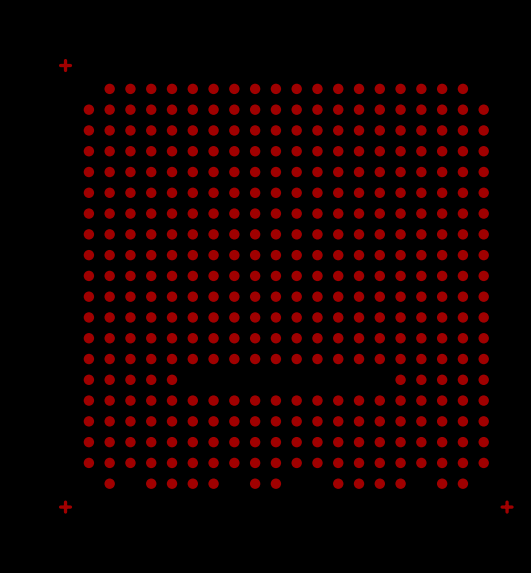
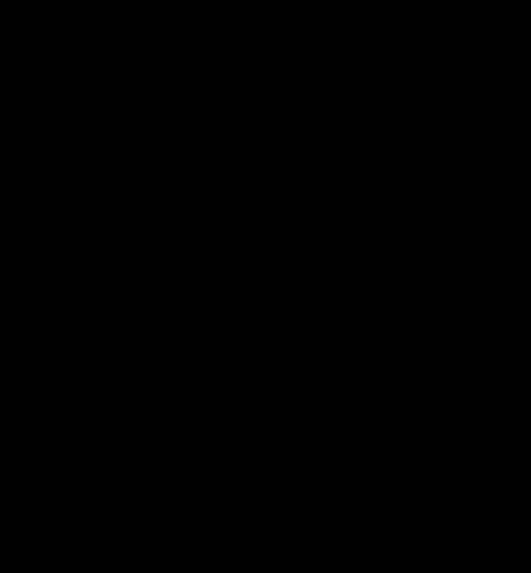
part: (286, 286) -> none

